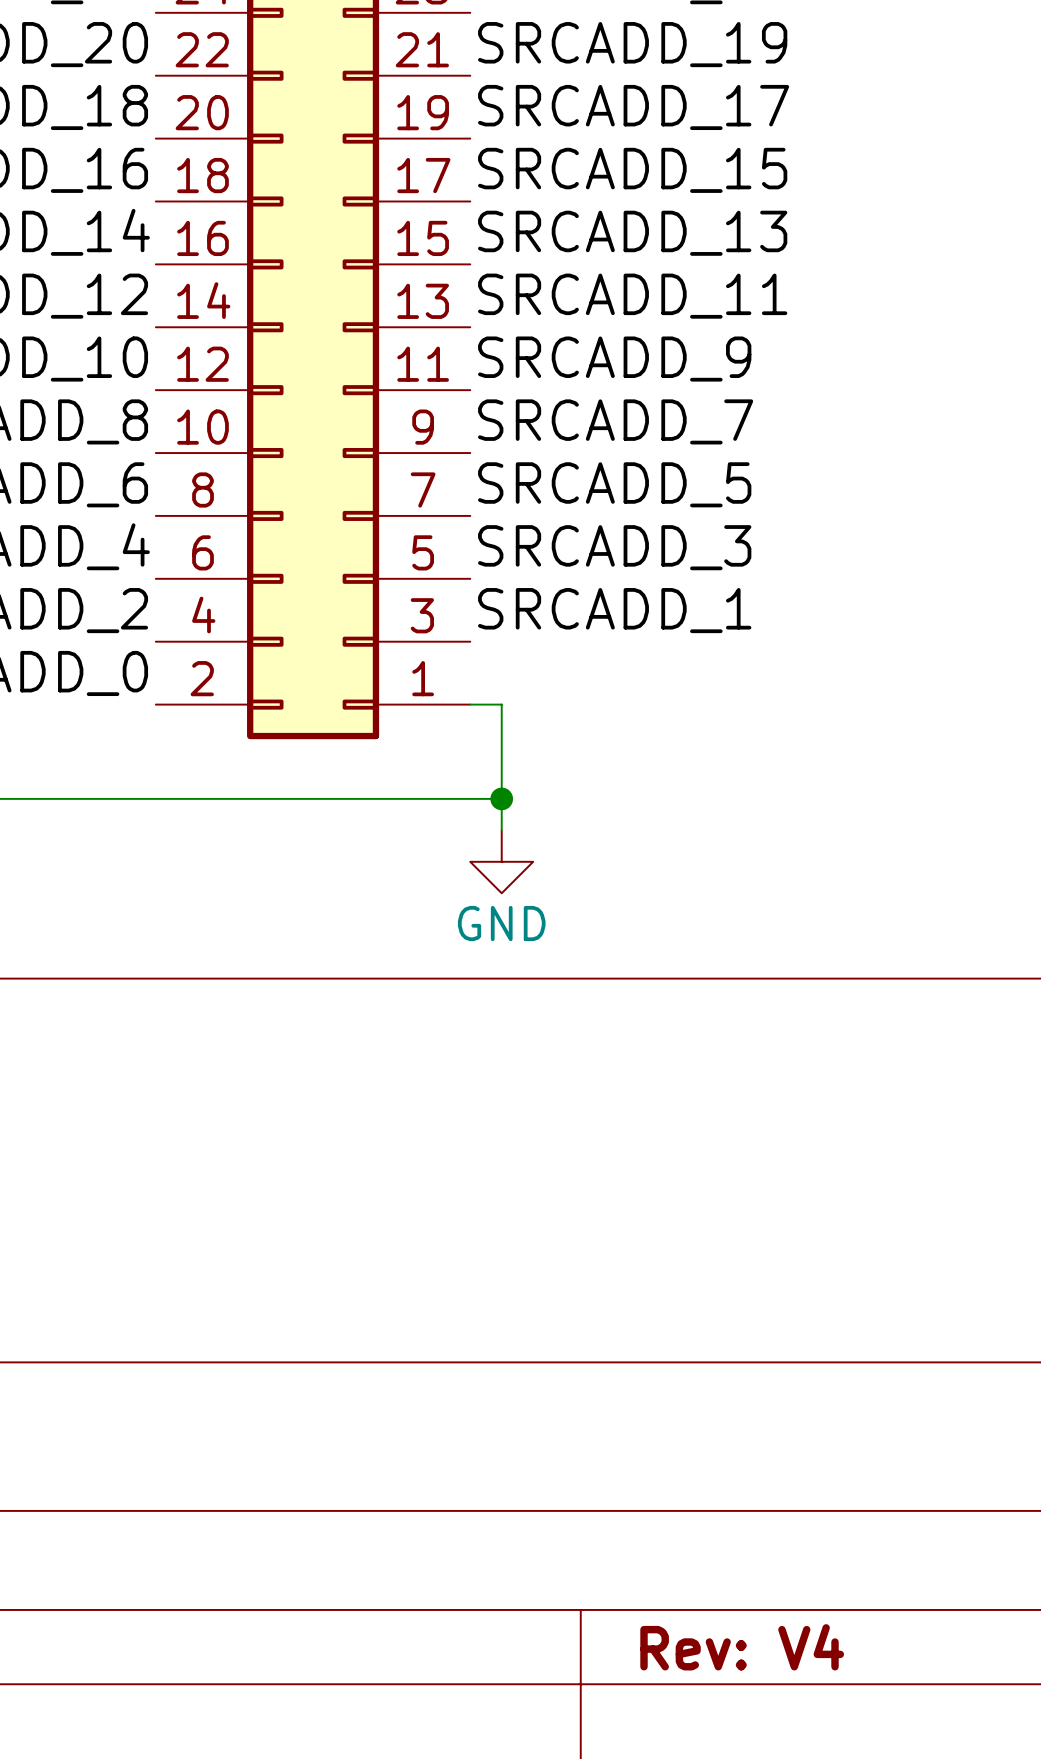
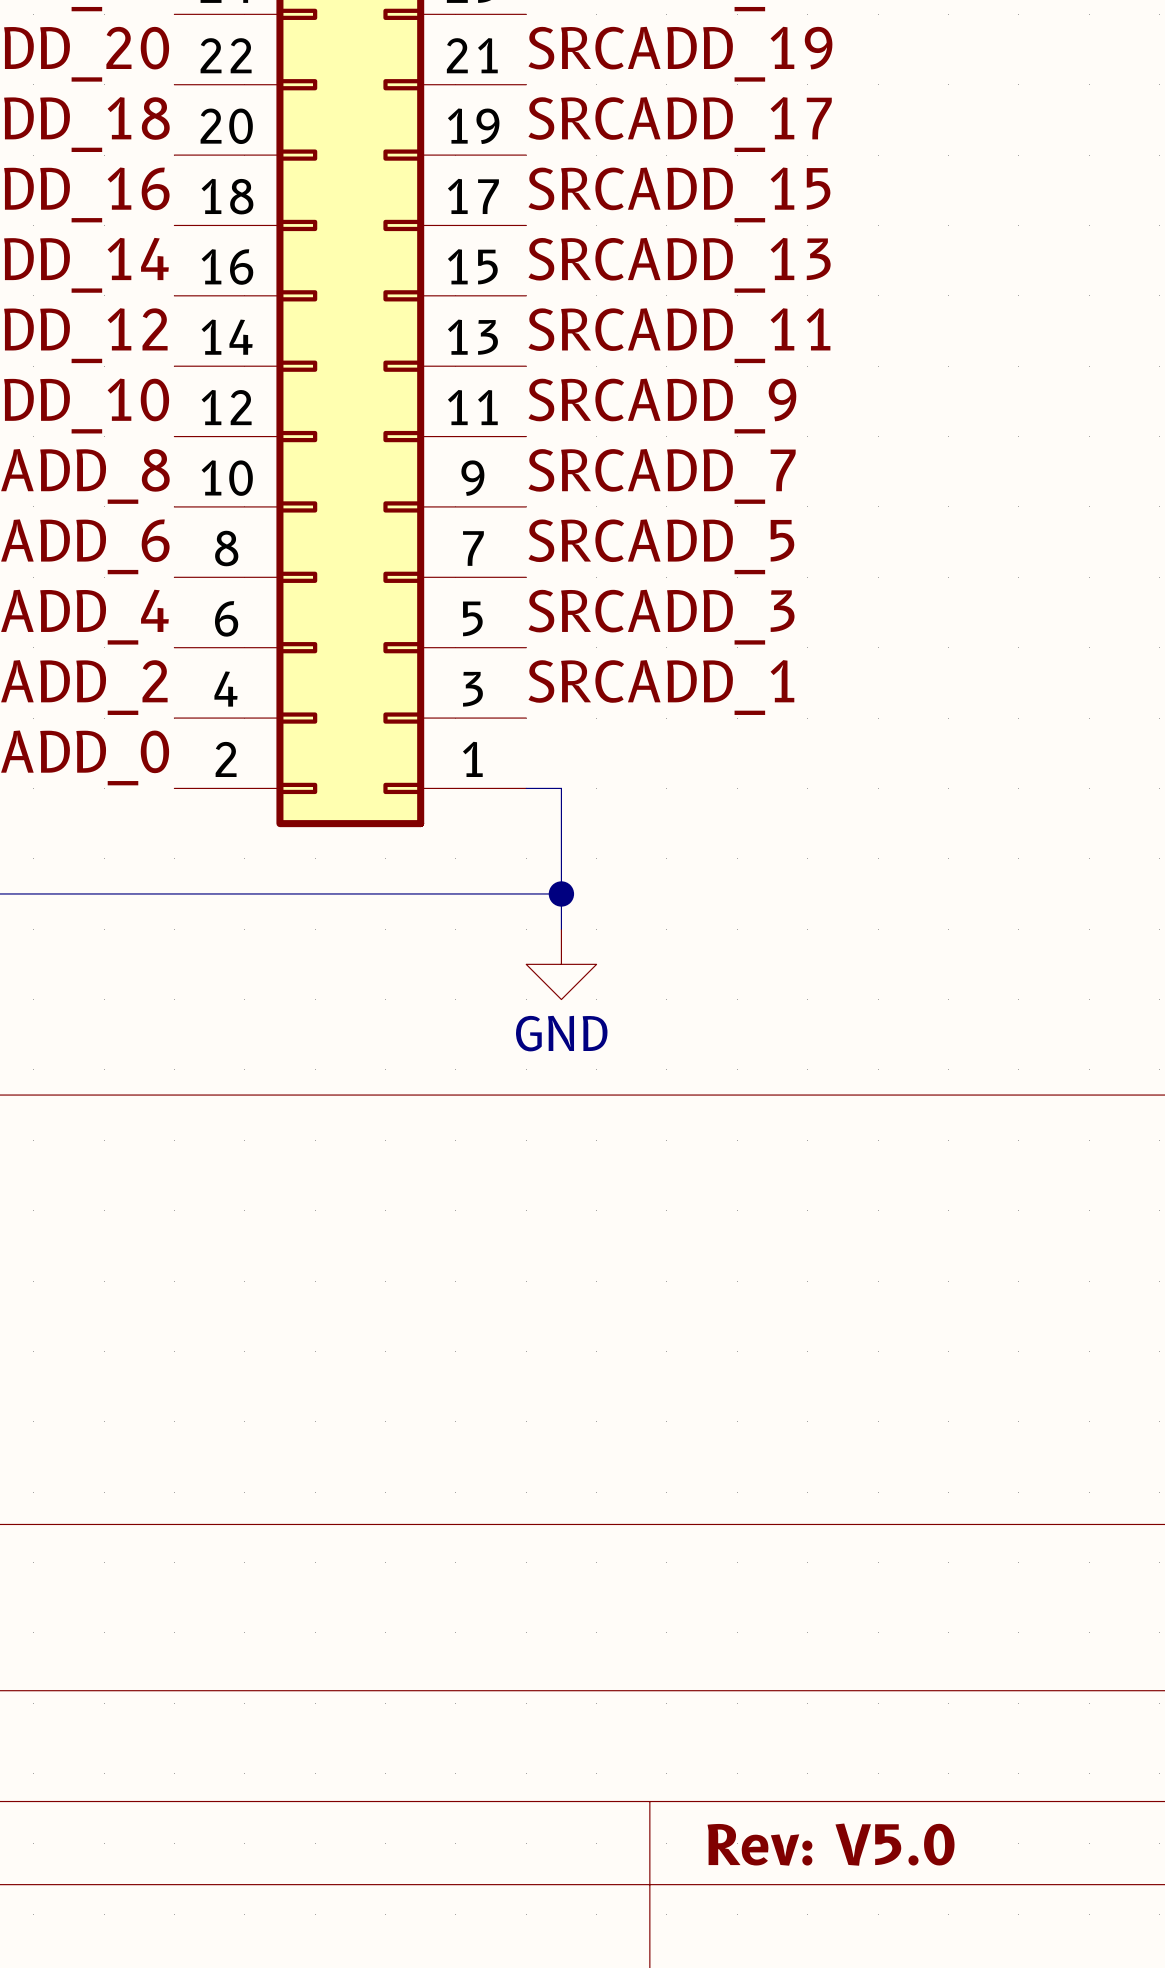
title block: Rev: V4 (742, 1647) -> Rev: V5.0 (831, 1844)

